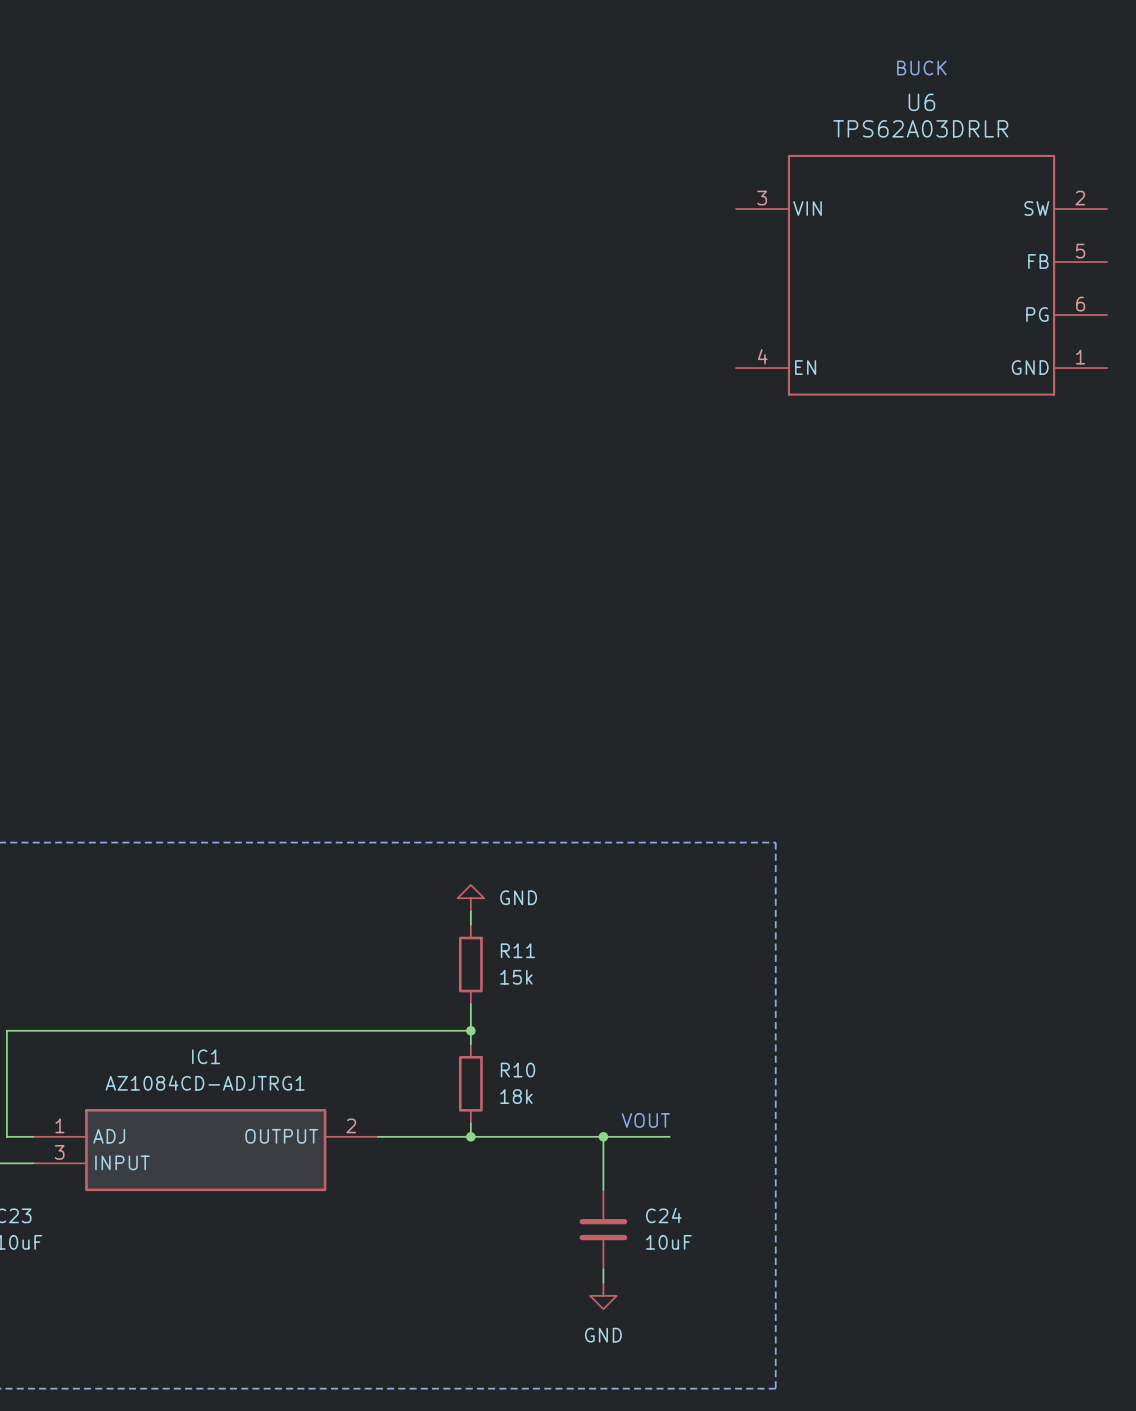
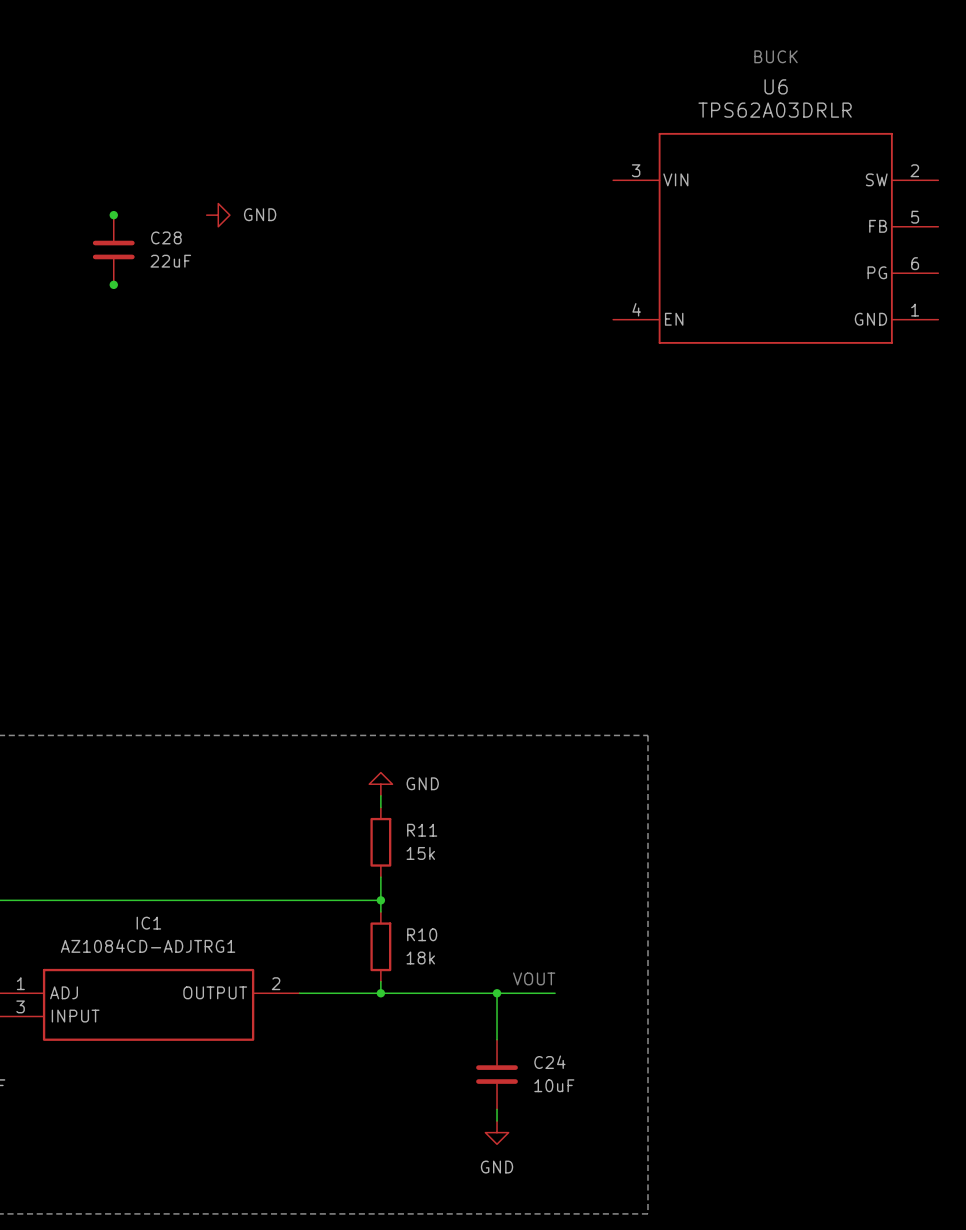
junction: none -> (113, 215)
power symbol: none -> GND (218, 215)
C28: none -> 22uF (113, 249)
junction: none -> (113, 284)

